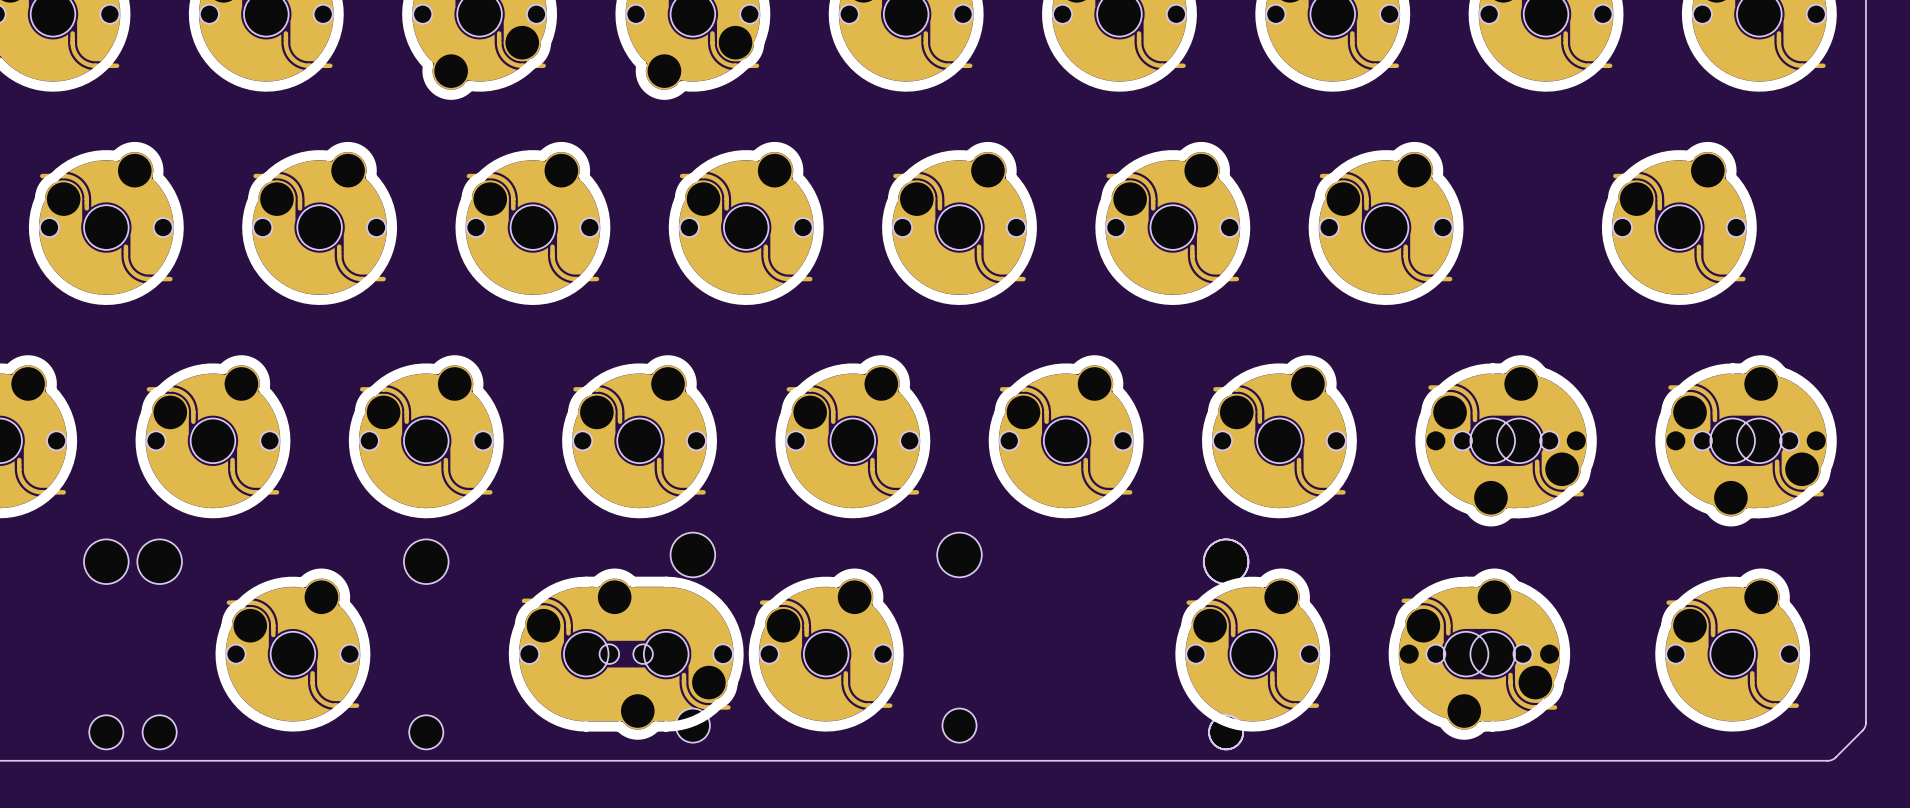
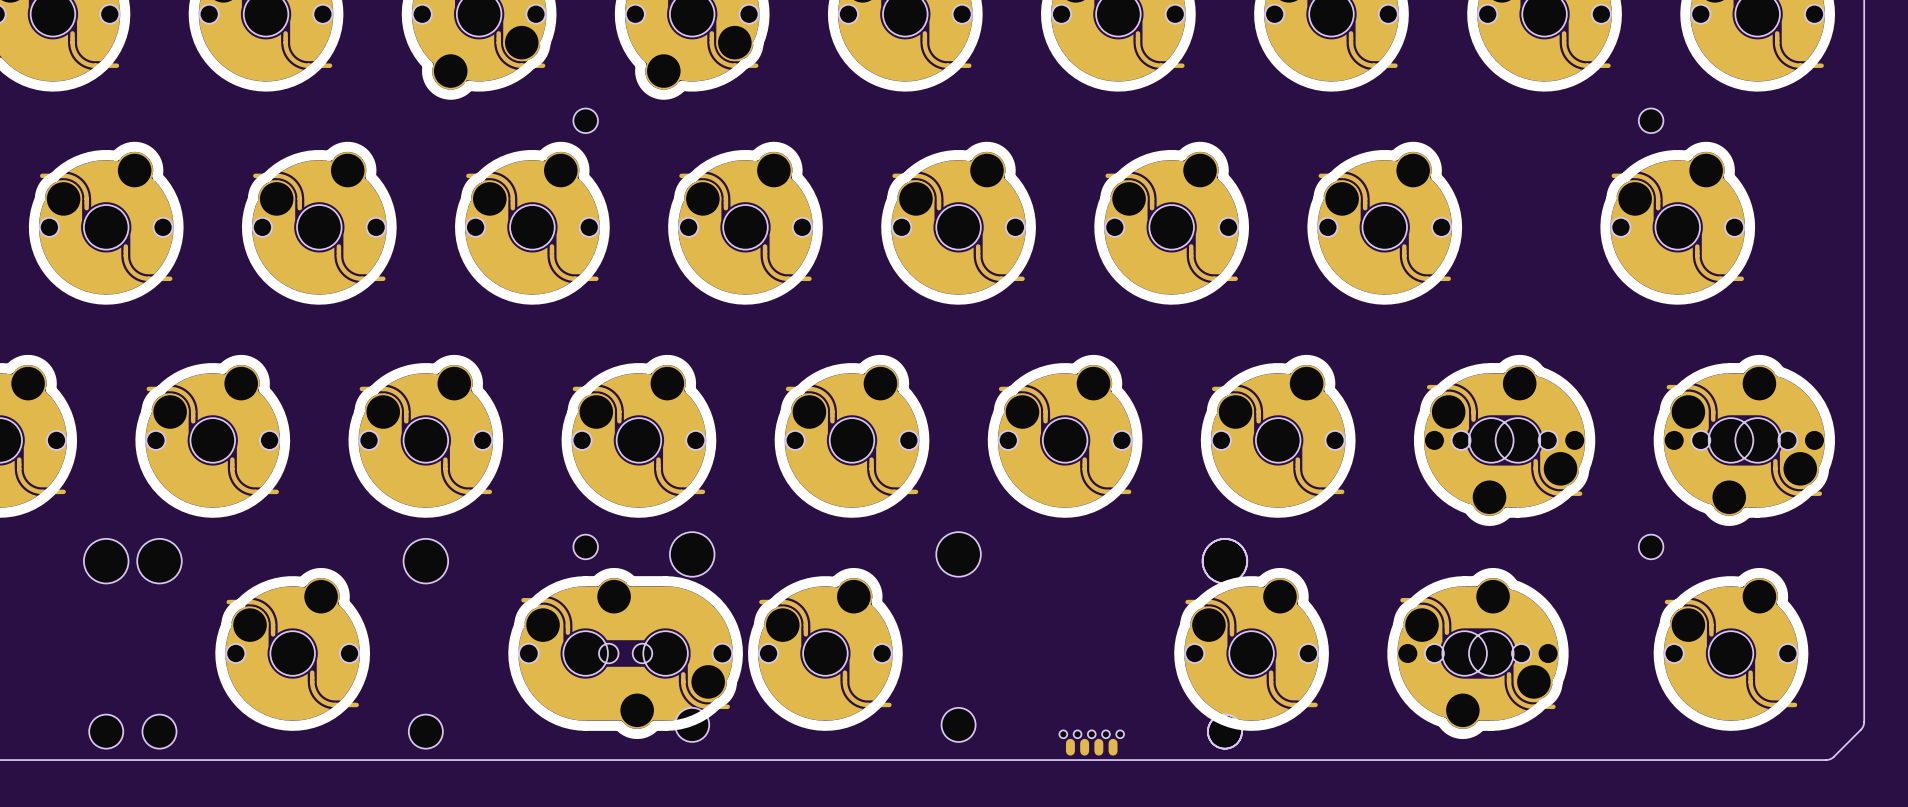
part: none -> (585, 120)
part: none -> (1651, 120)
part: none -> (585, 546)
part: none -> (1651, 546)
part: none -> (1091, 743)

